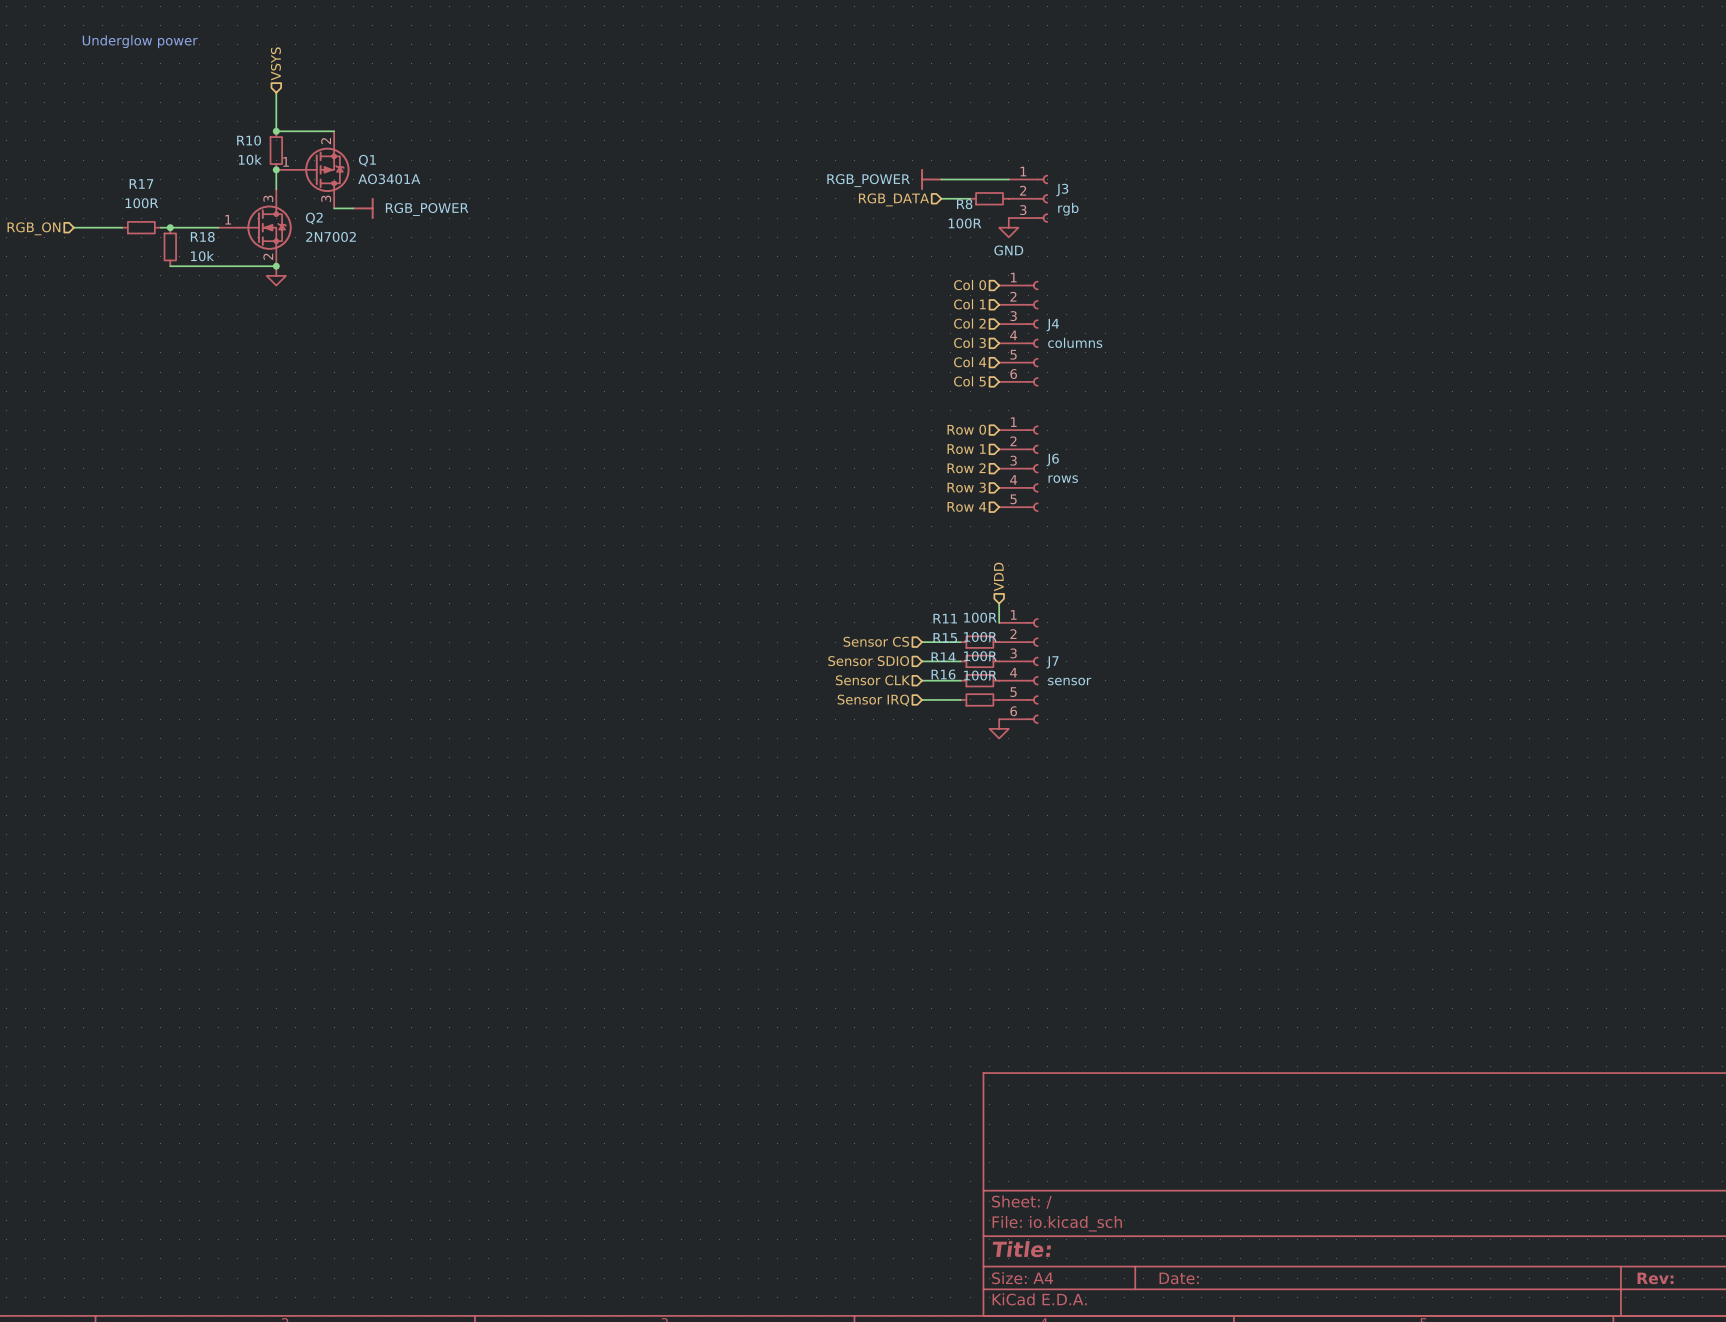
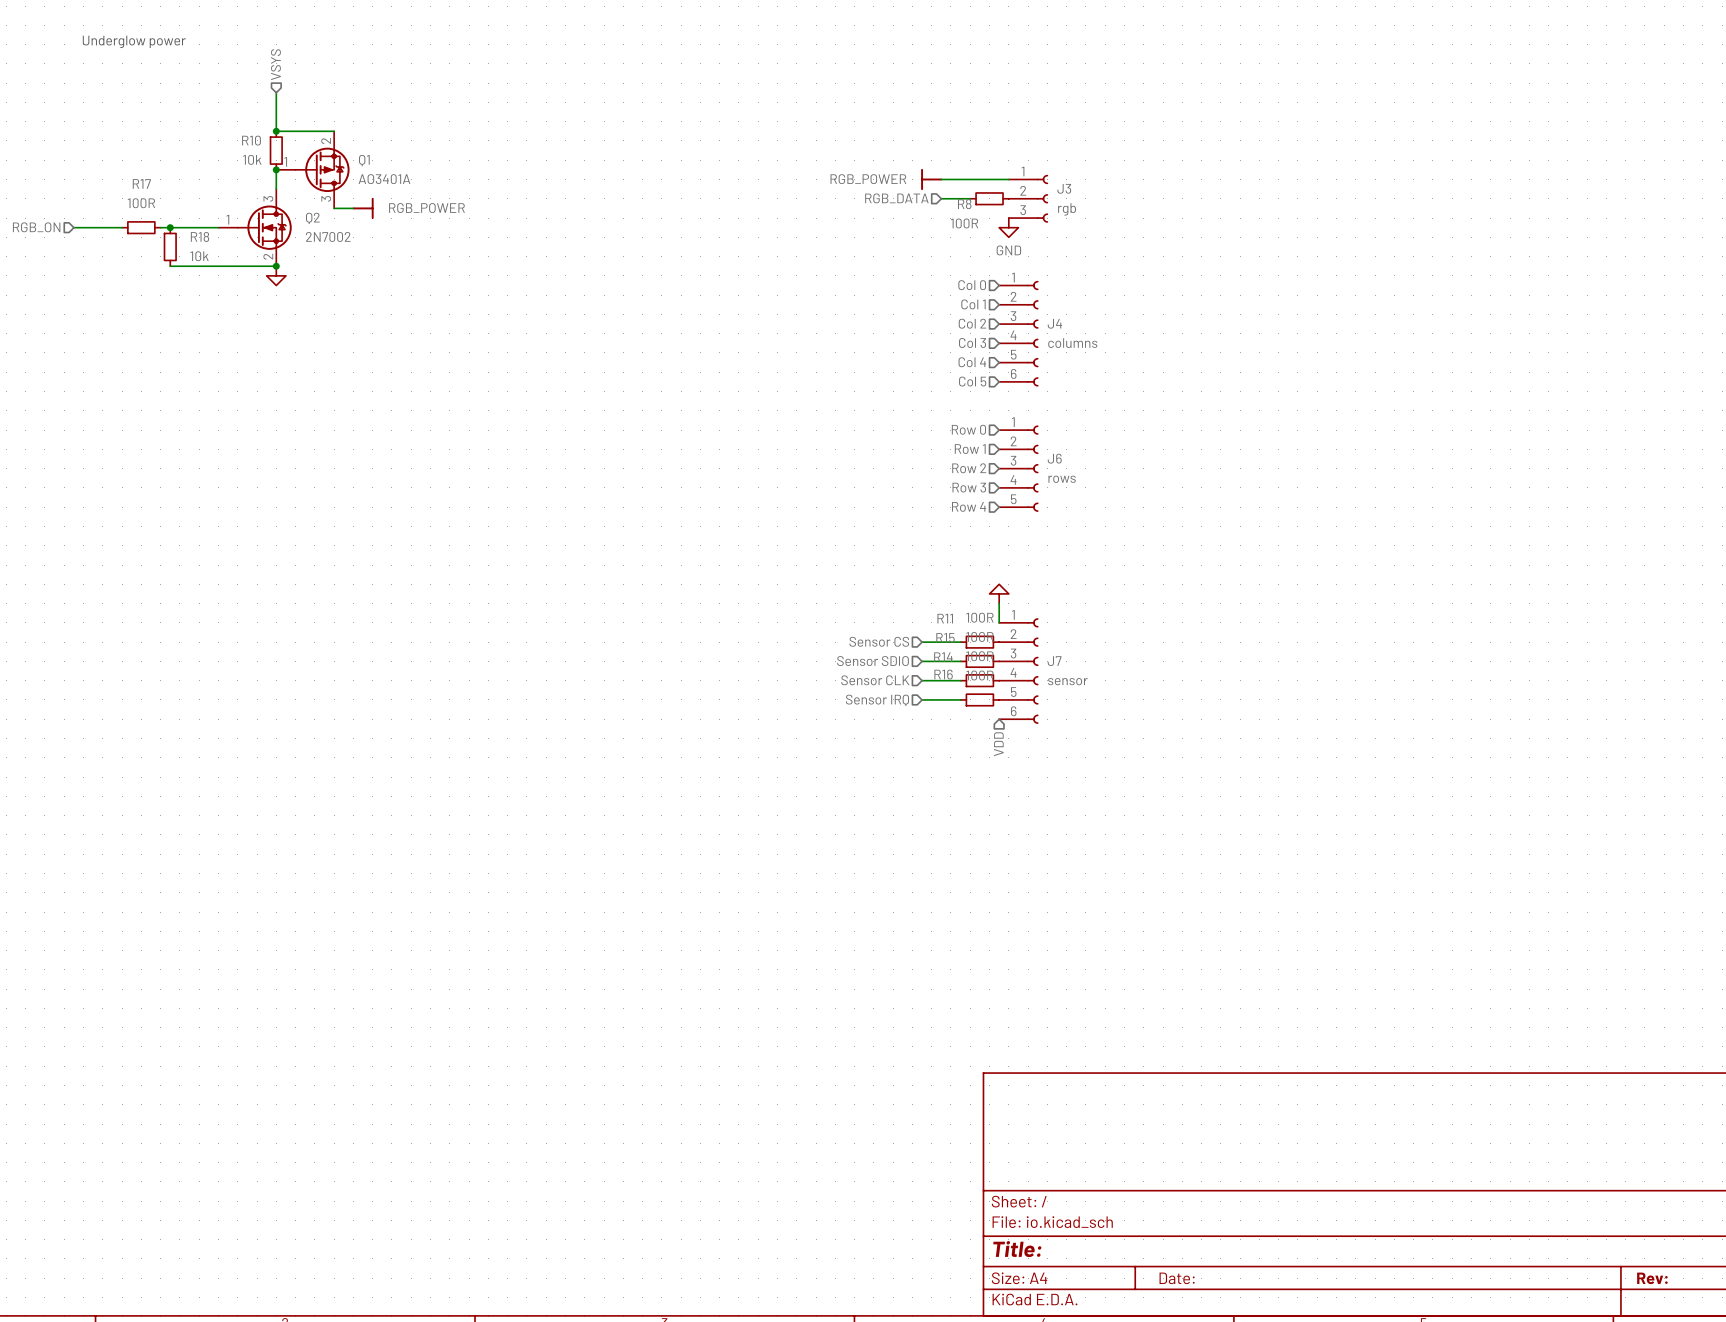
hierarchical label rotation: 0° (998, 576) -> 180° (998, 744)
hierarchical label position: VDD (998, 576) -> VDD (998, 744)
power symbol rotation: 0° (999, 728) -> 180° (999, 593)
power symbol position: (999, 728) -> (999, 593)

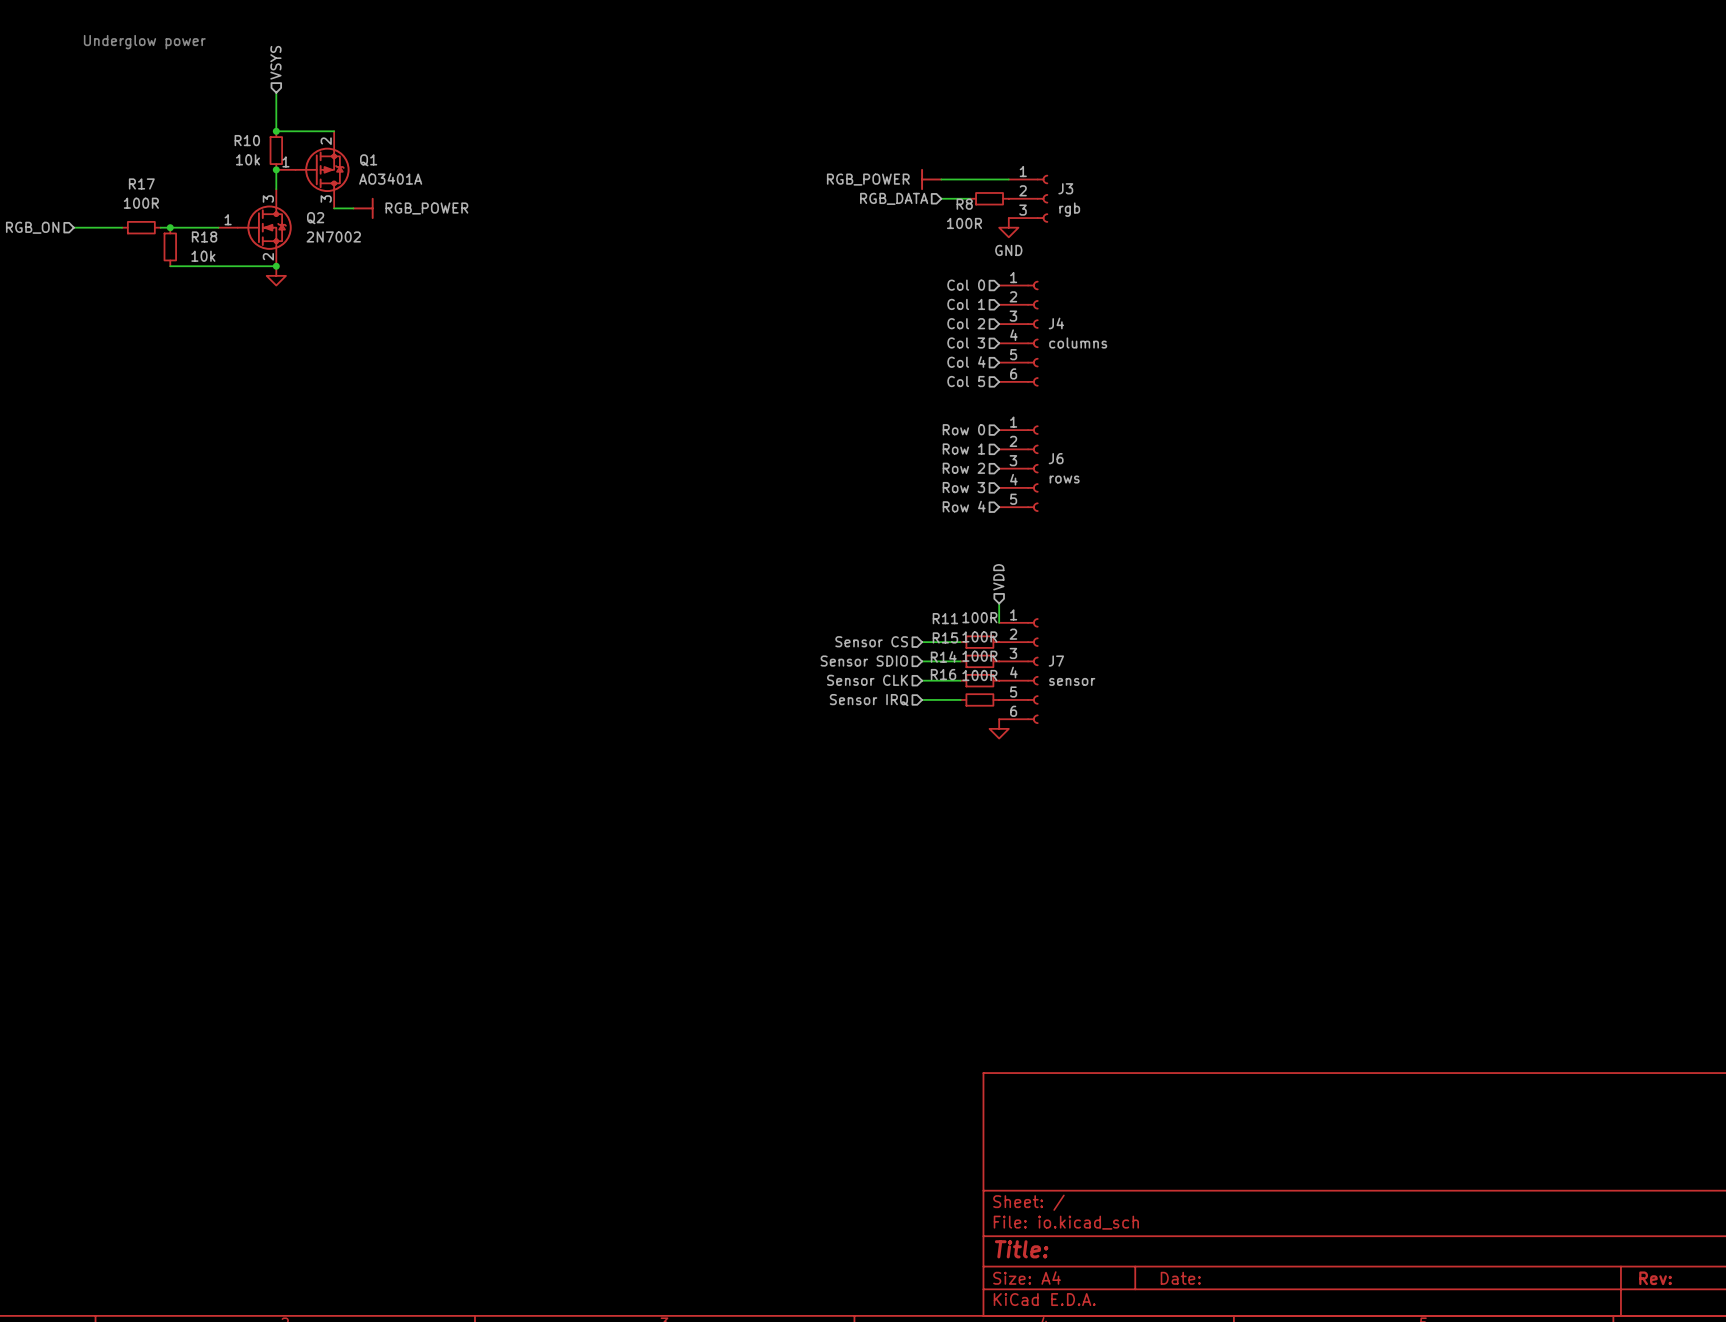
power symbol rotation: 0° (999, 593) -> 180° (999, 728)
power symbol position: (999, 593) -> (999, 728)
hierarchical label rotation: 0° (998, 744) -> 180° (998, 577)
hierarchical label position: VDD (998, 744) -> VDD (998, 577)

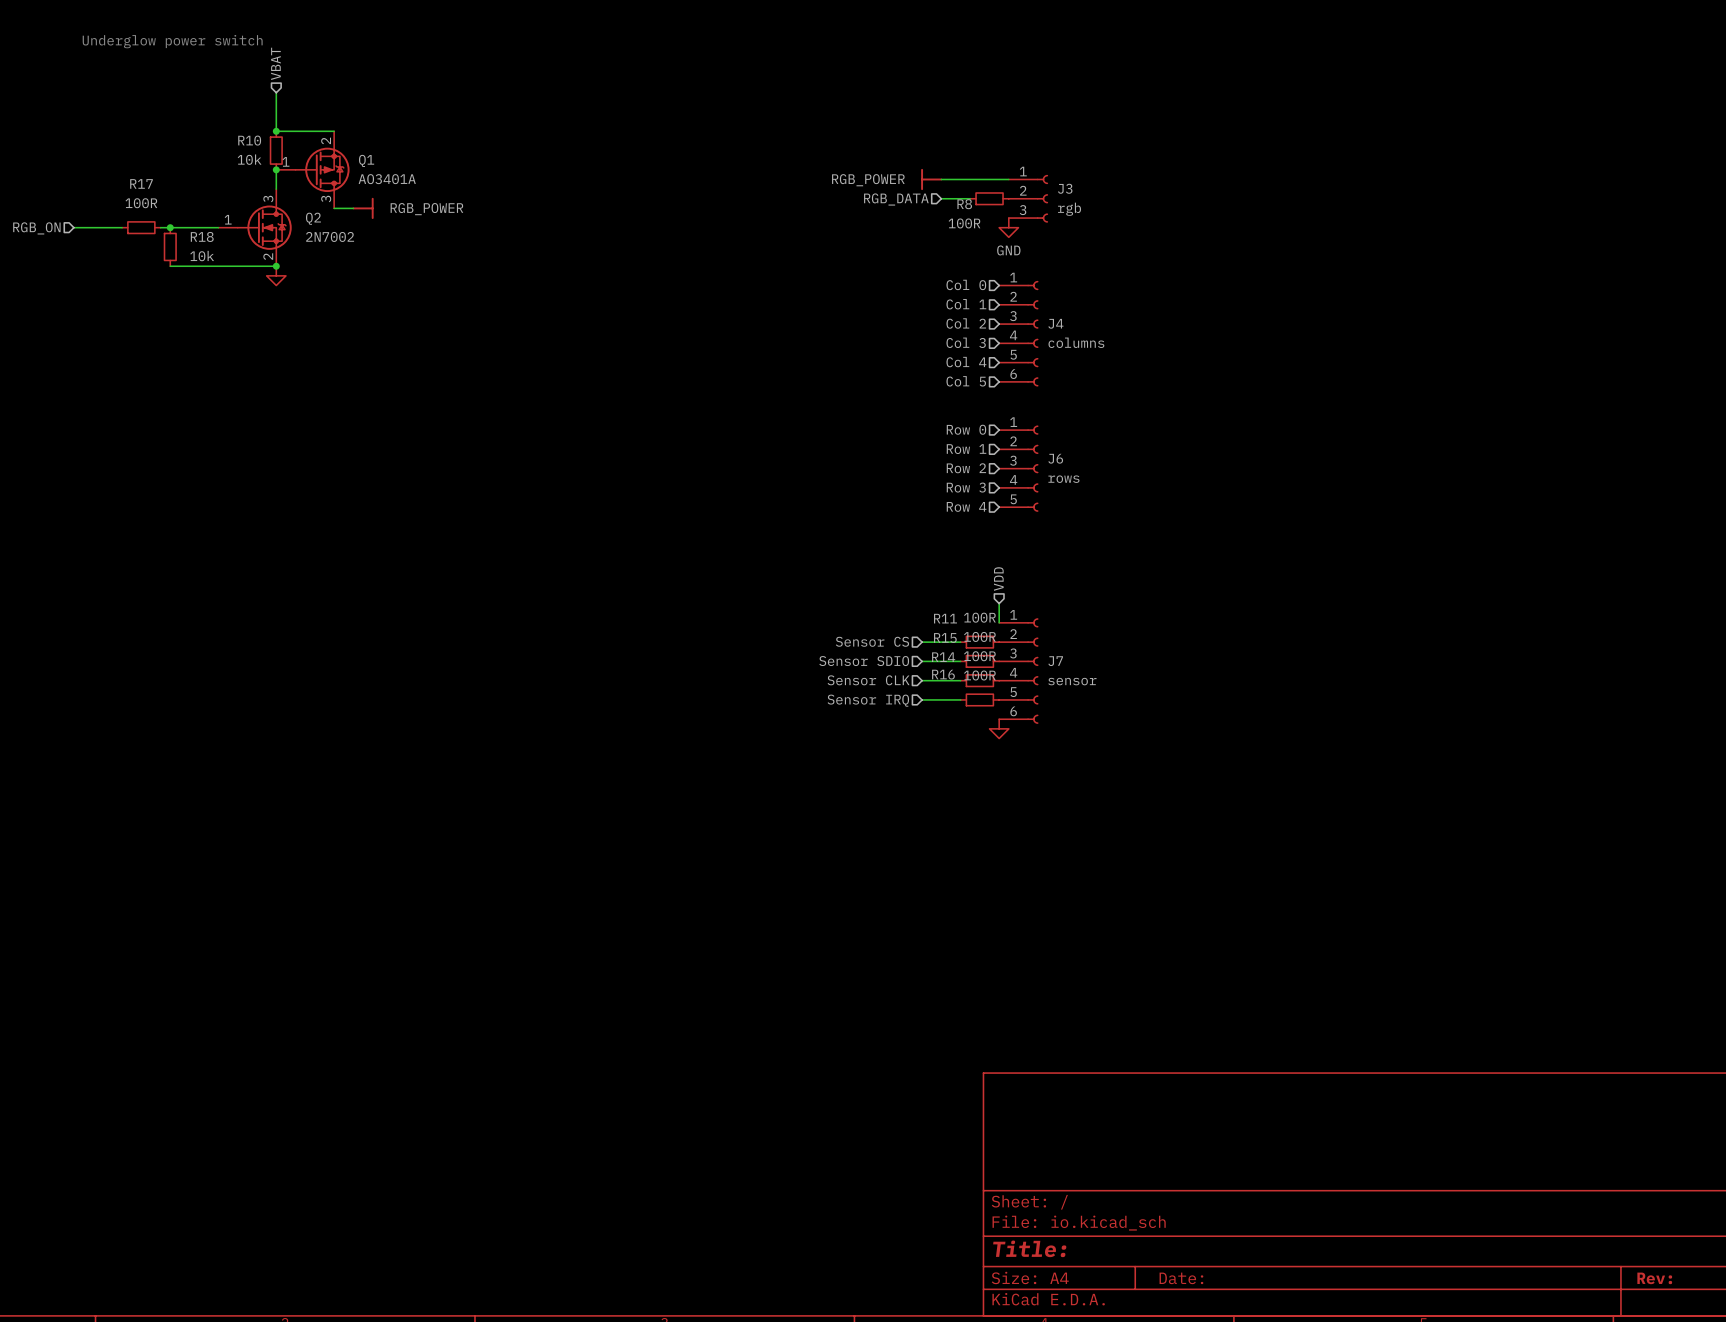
text: Underglow power (144, 42) -> Underglow power switch (172, 41)
hierarchical label: VSYS (275, 62) -> VBAT (275, 63)

